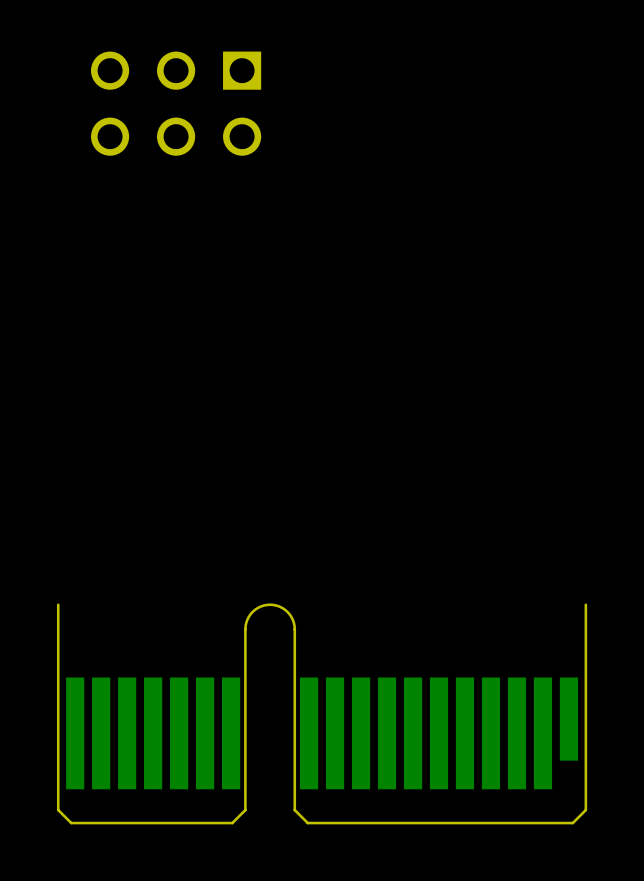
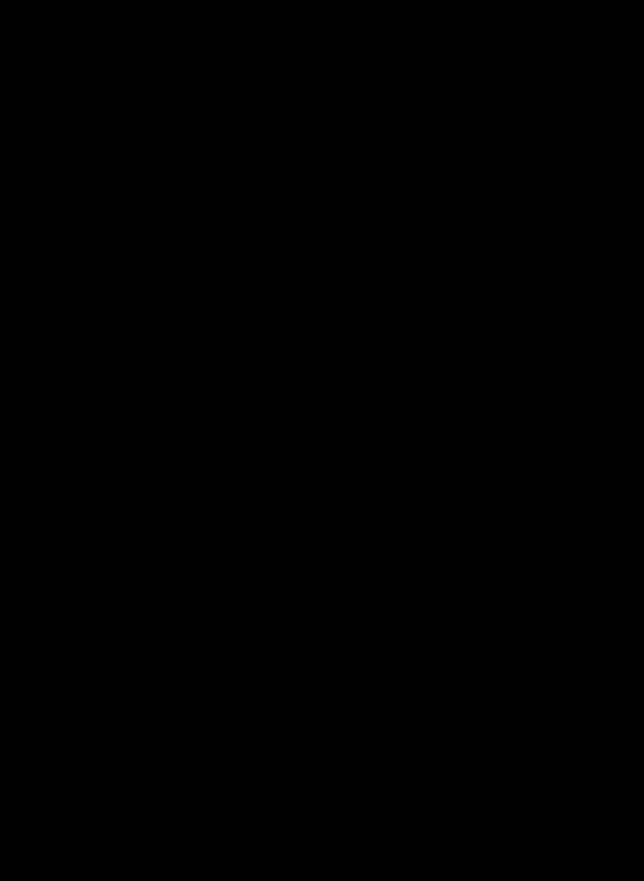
part: (176, 103) -> none
part: (322, 713) -> none

